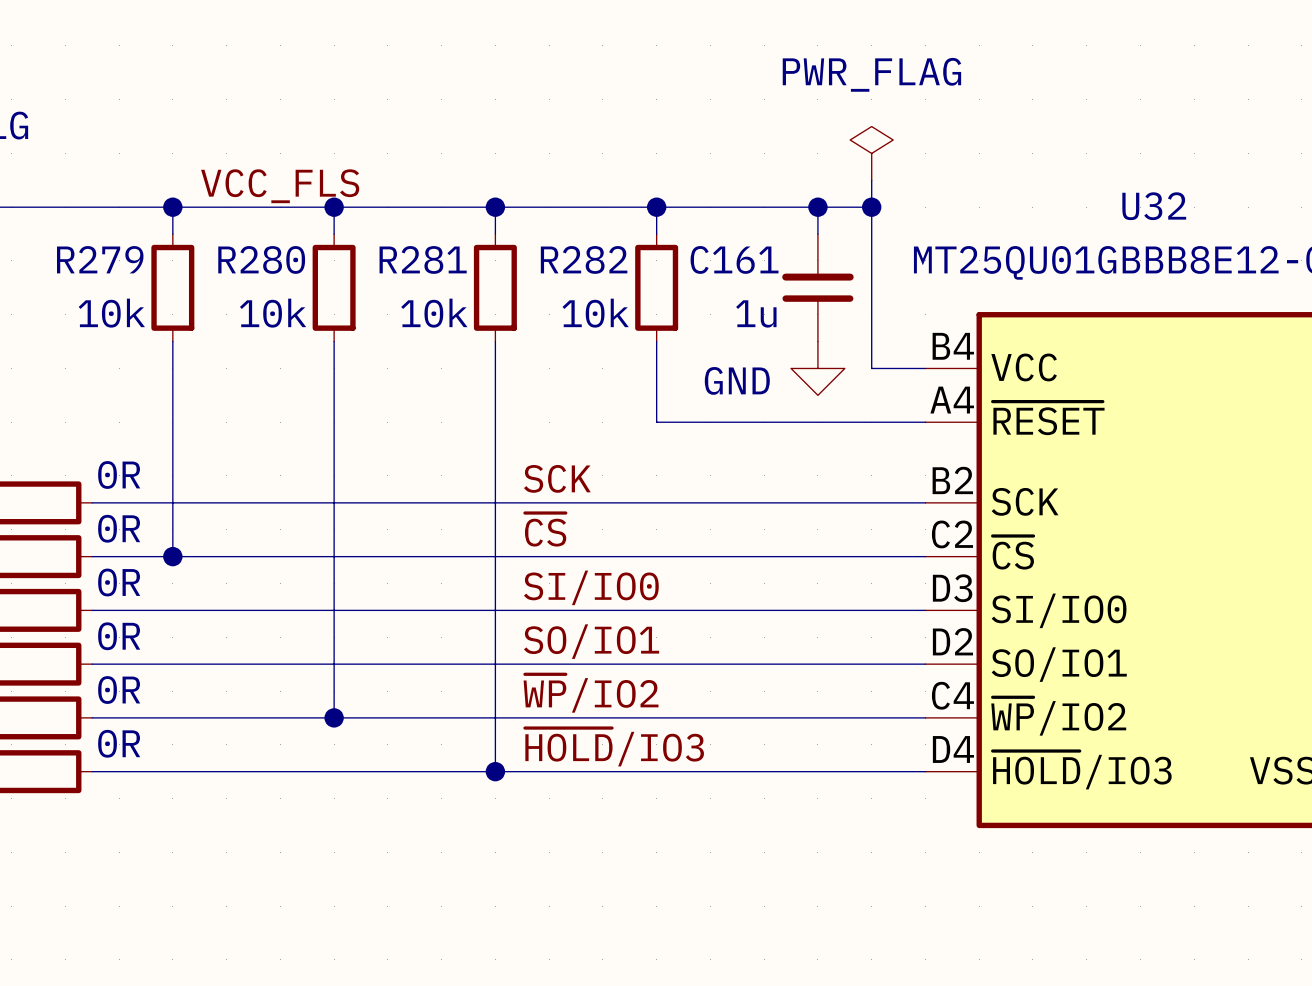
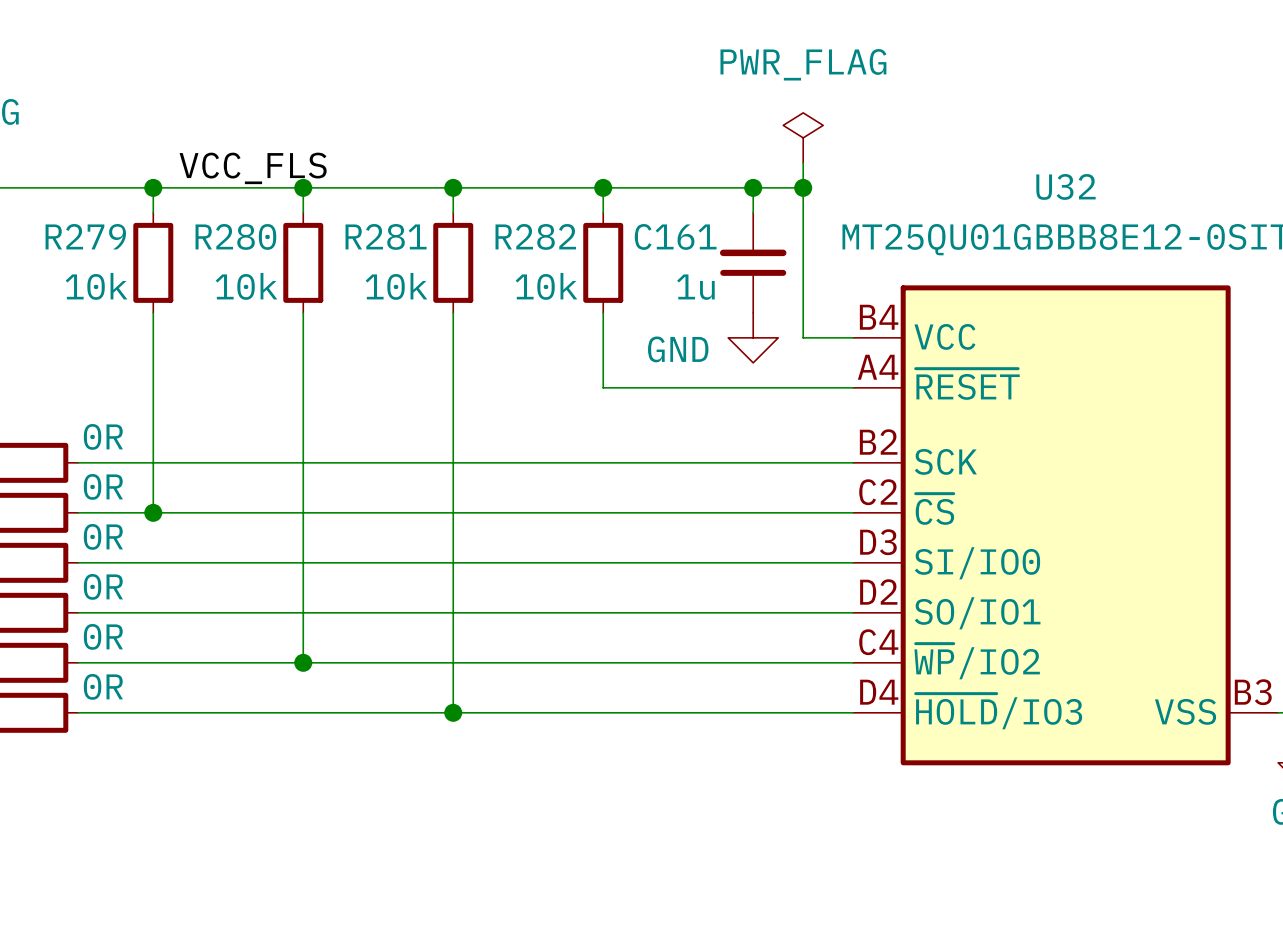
label: SCK (557, 478) -> none
label: ~{CS} (545, 529) -> none
label: SI/IO0 (591, 587) -> none
label: SO/IO1 (591, 641) -> none
label: ~{WP}/IO2 (591, 693) -> none
label: ~{HOLD}/IO3 (614, 747) -> none

